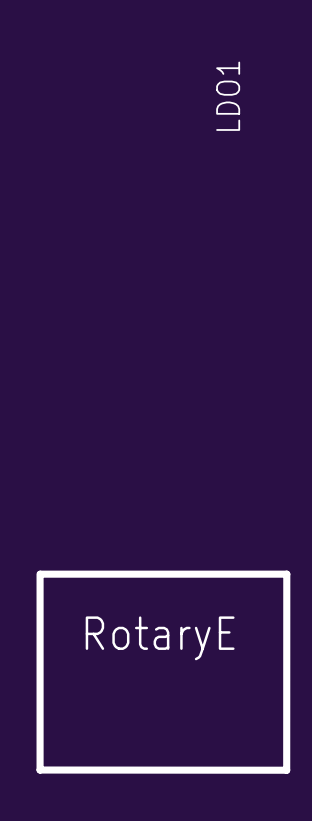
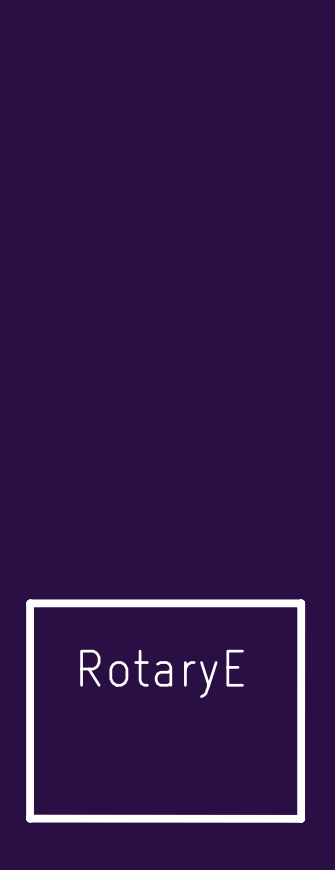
text: LDO1 (228, 96) -> none

